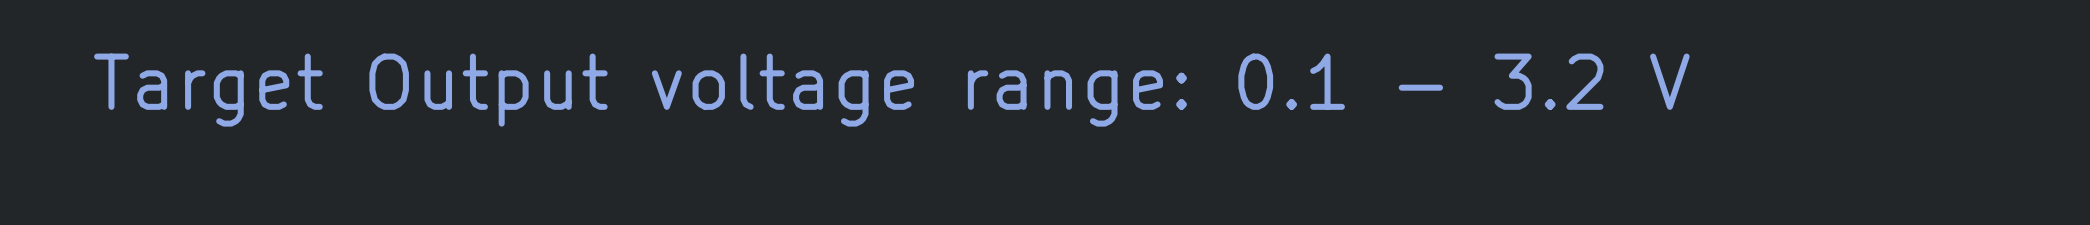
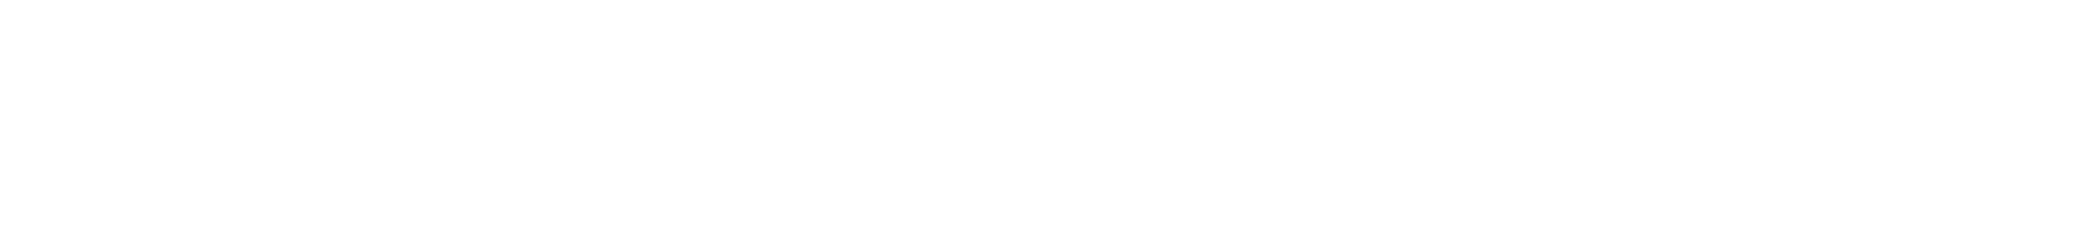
text: Target Output voltage range: 0.1 - 3.2 V (891, 90) -> none

